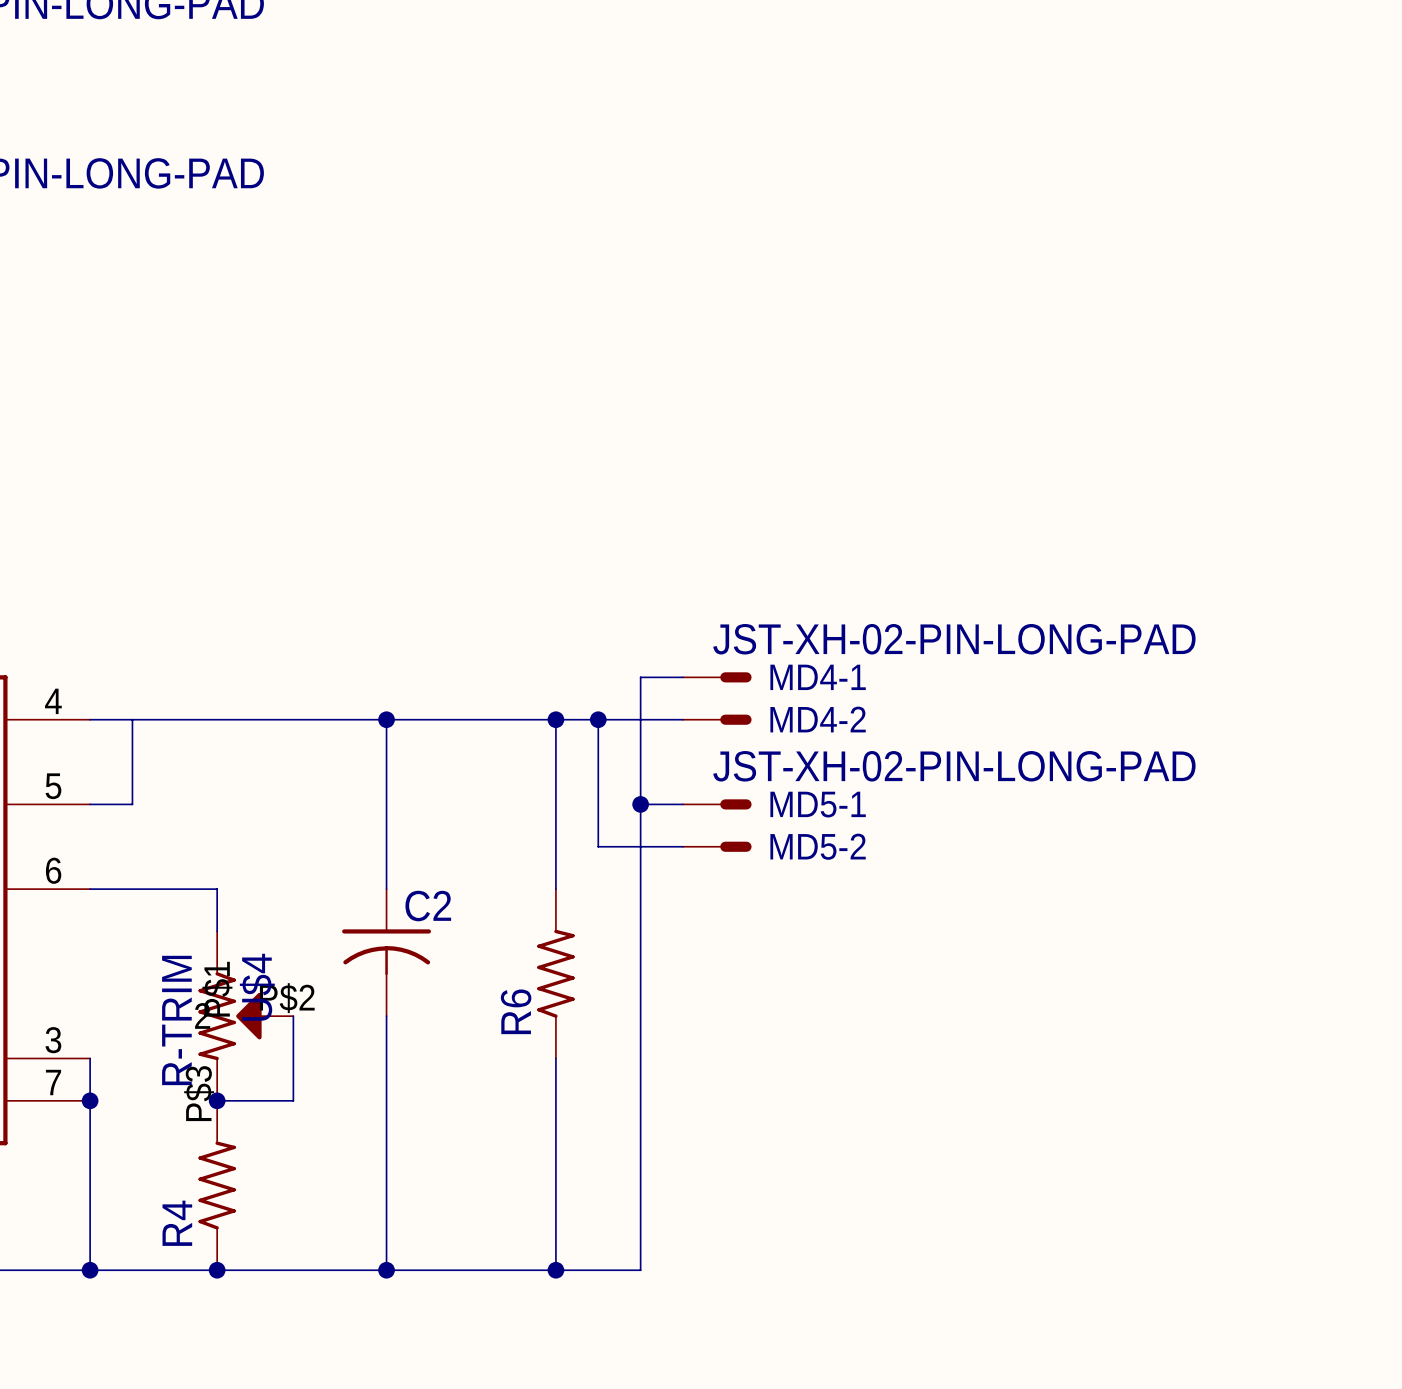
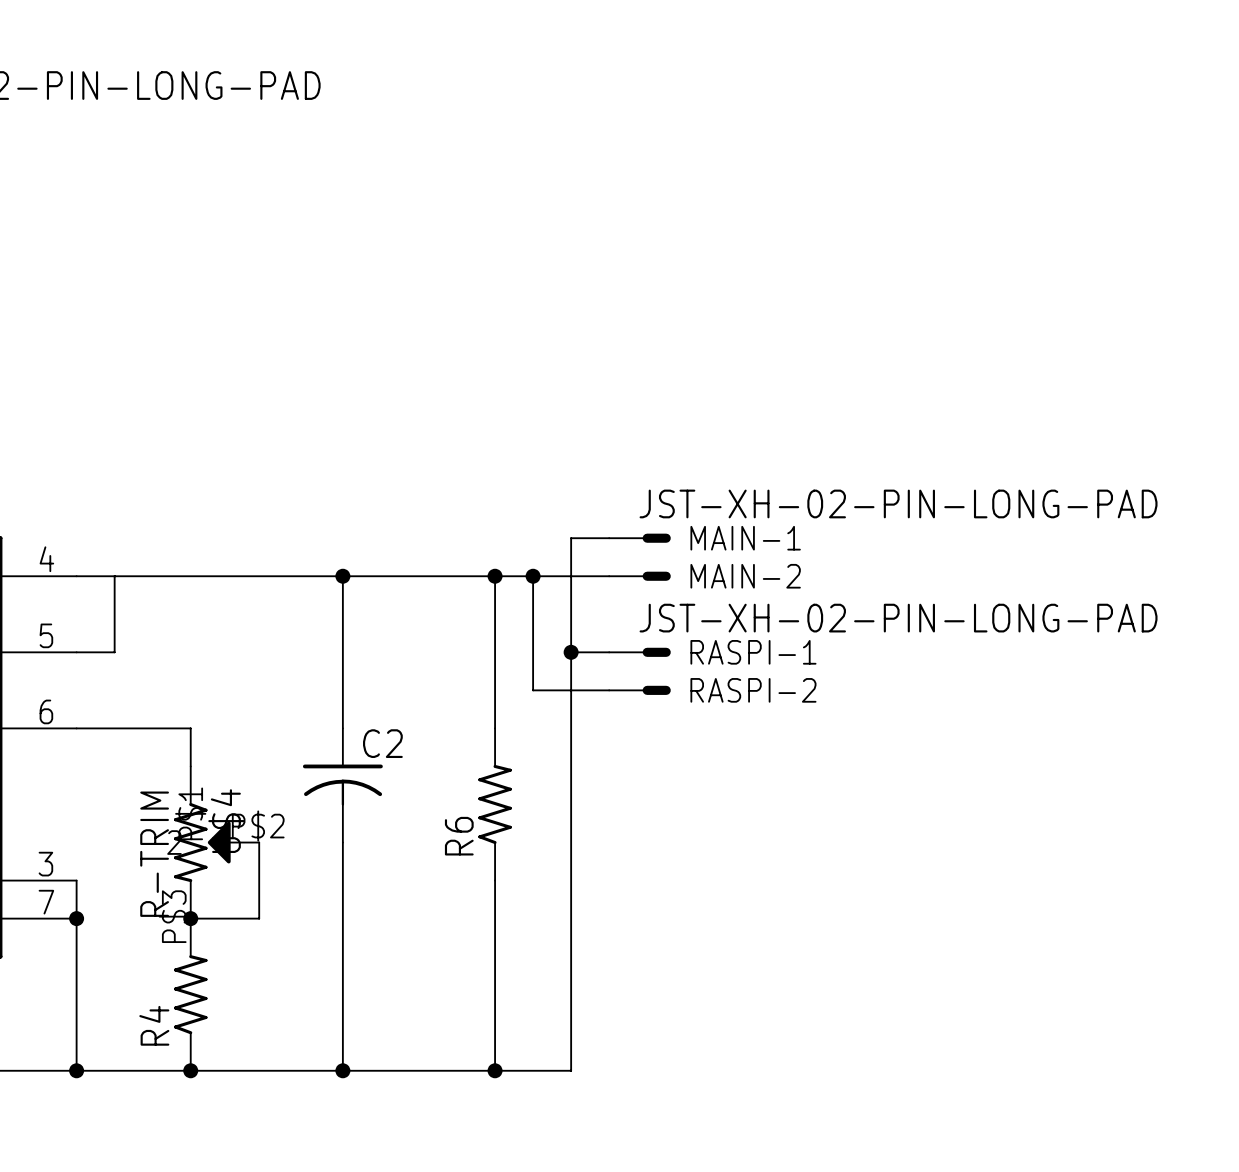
MD4-1 name: MD4-1 (818, 677) -> MAIN-1 (745, 538)
MD4-2 name: MD4-2 (818, 719) -> MAIN-2 (745, 576)
MD5-1 name: MD5-1 (818, 804) -> RASPI-1 (753, 652)
MD5-2 name: MD5-2 (818, 846) -> RASPI-2 (753, 690)

